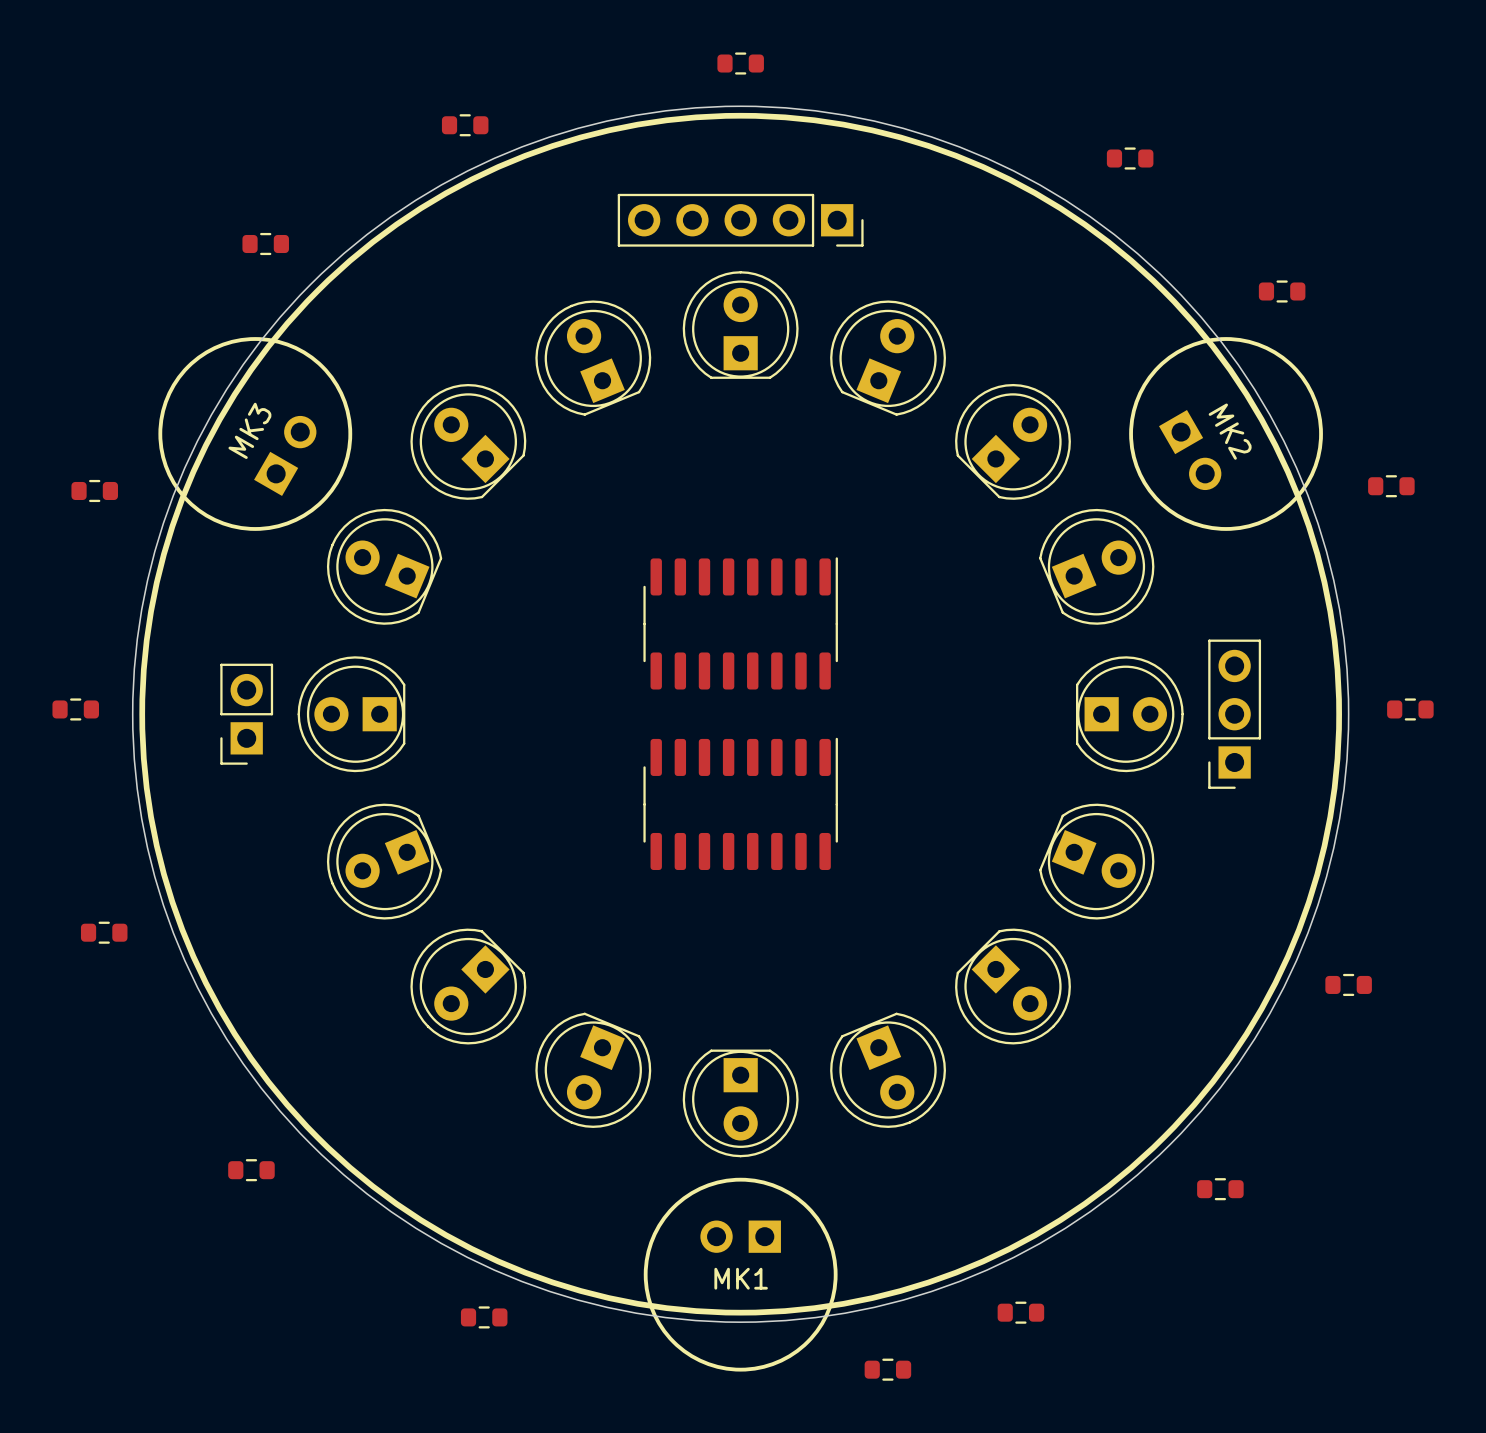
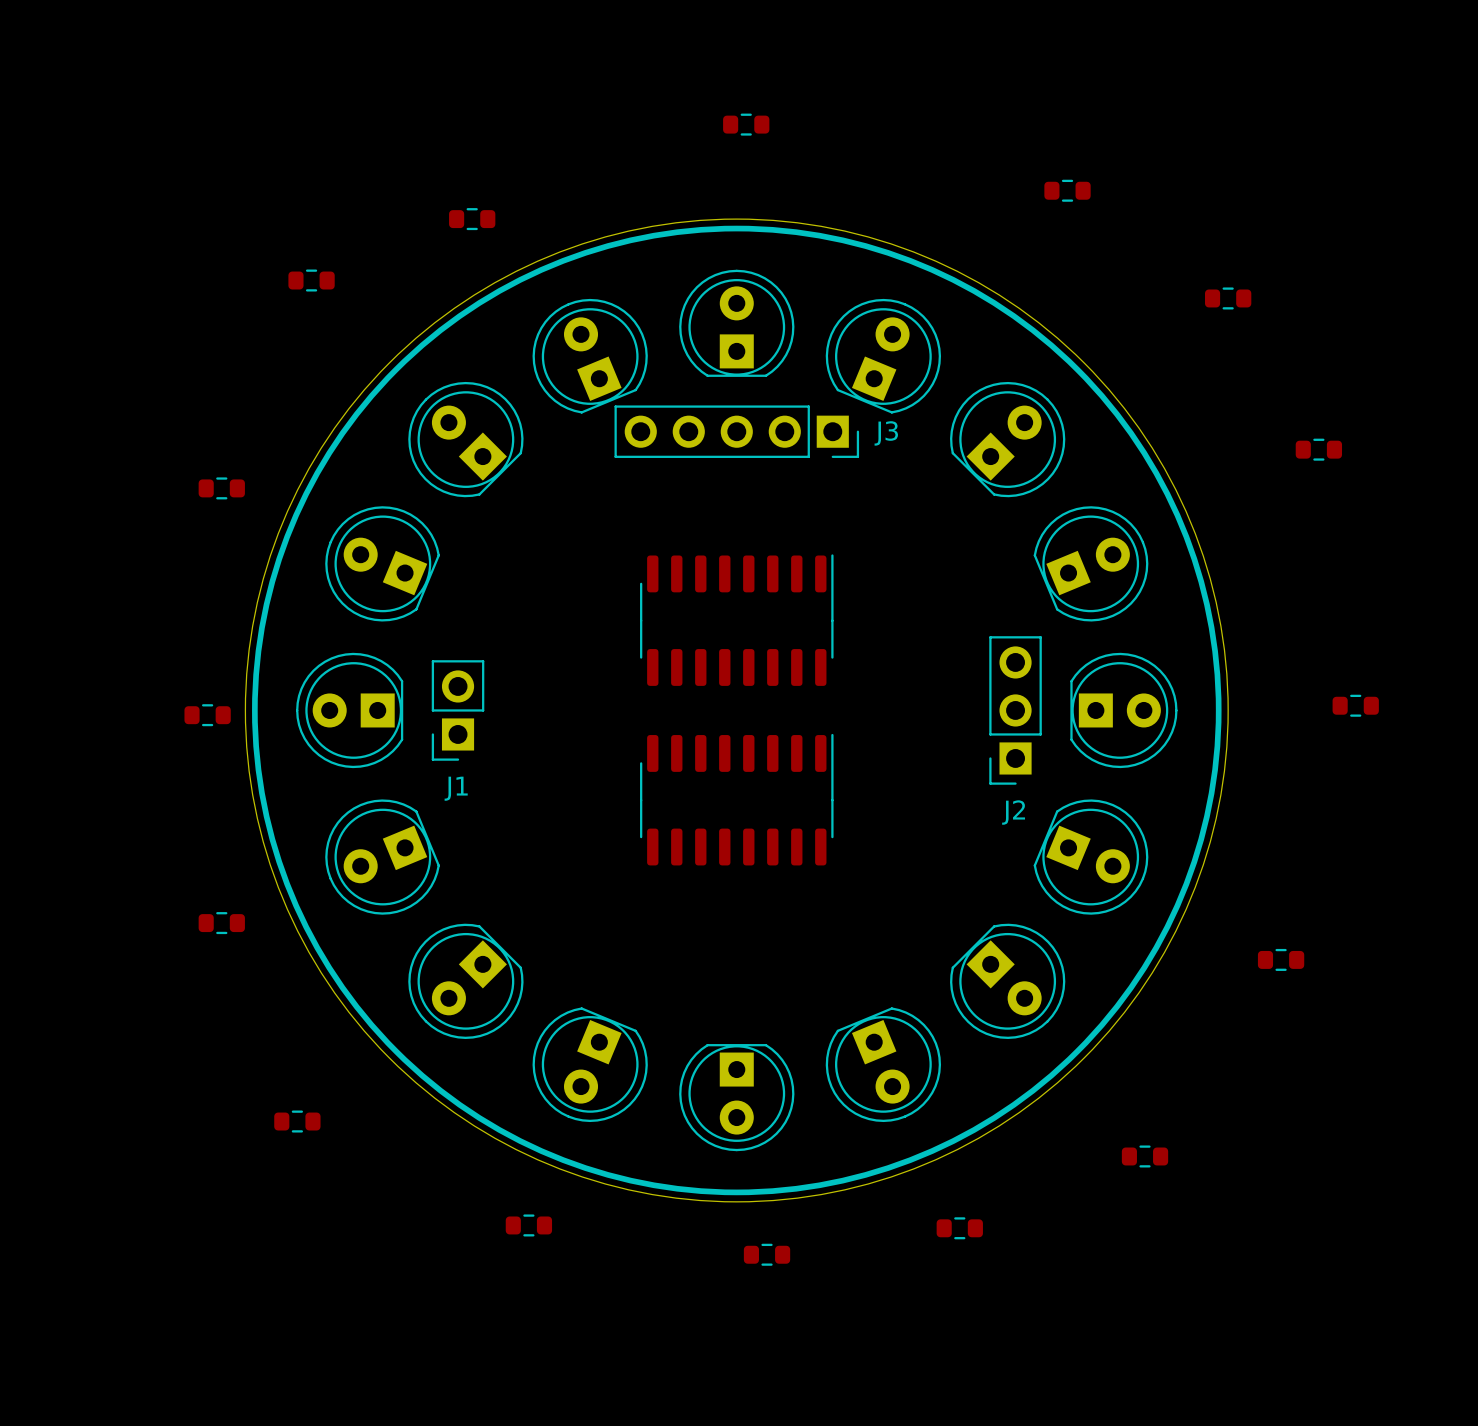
part position: (740, 63) -> (746, 124)
round board edge size: [132, 105, 1350, 1323] -> [244, 218, 1229, 1203]
drawing shape: [139, 112, 1342, 1316] -> [252, 225, 1222, 1196]
part position: (465, 125) -> (472, 219)
part position: (1130, 158) -> (1067, 190)
part: (740, 220) -> none
part position: (265, 244) -> (311, 280)
part position: (1282, 291) -> (1228, 298)
MK3: (255, 433) -> none
J3: none -> (736, 431)
MK2: (1226, 433) -> none
part position: (1391, 486) -> (1318, 449)
part: (94, 490) -> none
part: none -> (221, 488)
part: (75, 709) -> none
part position: (1410, 709) -> (1355, 705)
part: (246, 714) -> none
J1: none -> (458, 710)
J2: none -> (1015, 710)
part: (1234, 714) -> none
part: none -> (207, 715)
part: none -> (221, 923)
part: (104, 932) -> none
part position: (1348, 984) -> (1281, 959)
part position: (251, 1170) -> (297, 1121)
part position: (1220, 1189) -> (1145, 1156)
part: none -> (959, 1228)
part: none -> (767, 1254)
MK1: (740, 1274) -> none
part: (1020, 1312) -> none
part position: (484, 1317) -> (528, 1225)
part: (887, 1369) -> none

